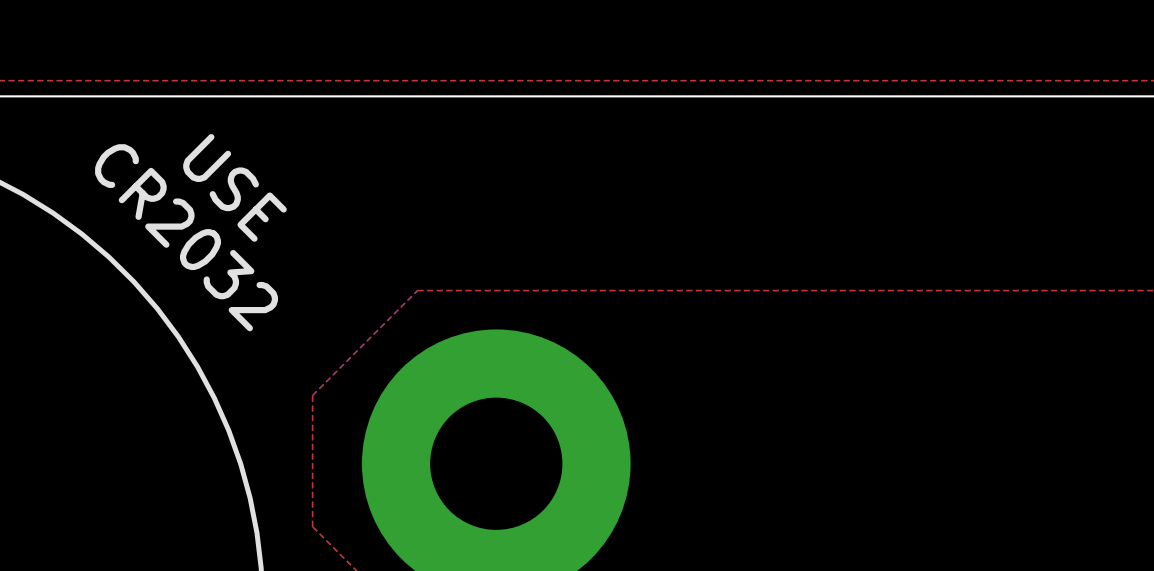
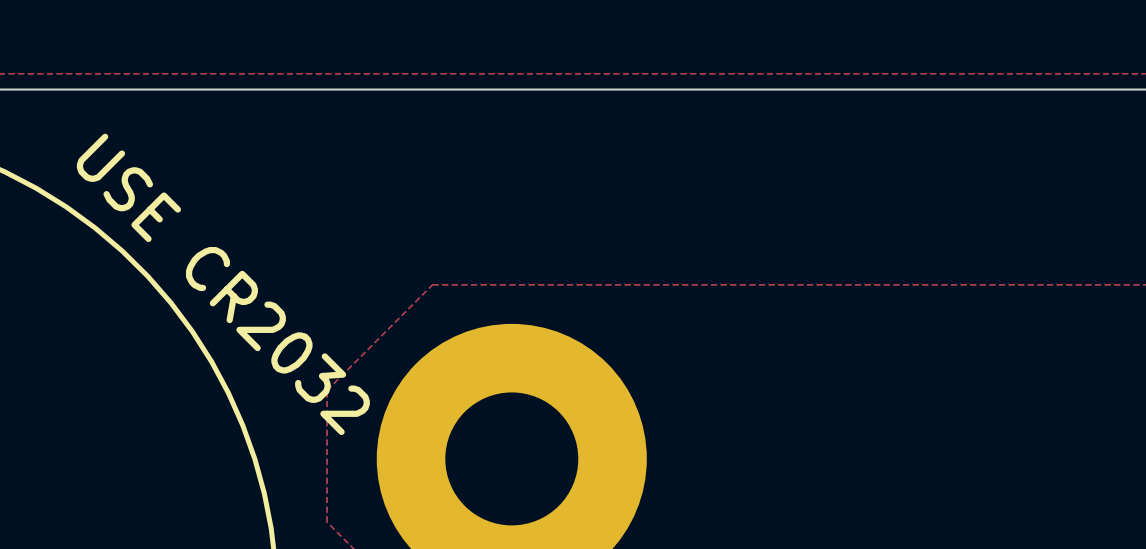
text: USE (235, 187) -> none
text: CR2032 (186, 237) -> USE CR2032 (223, 284)

